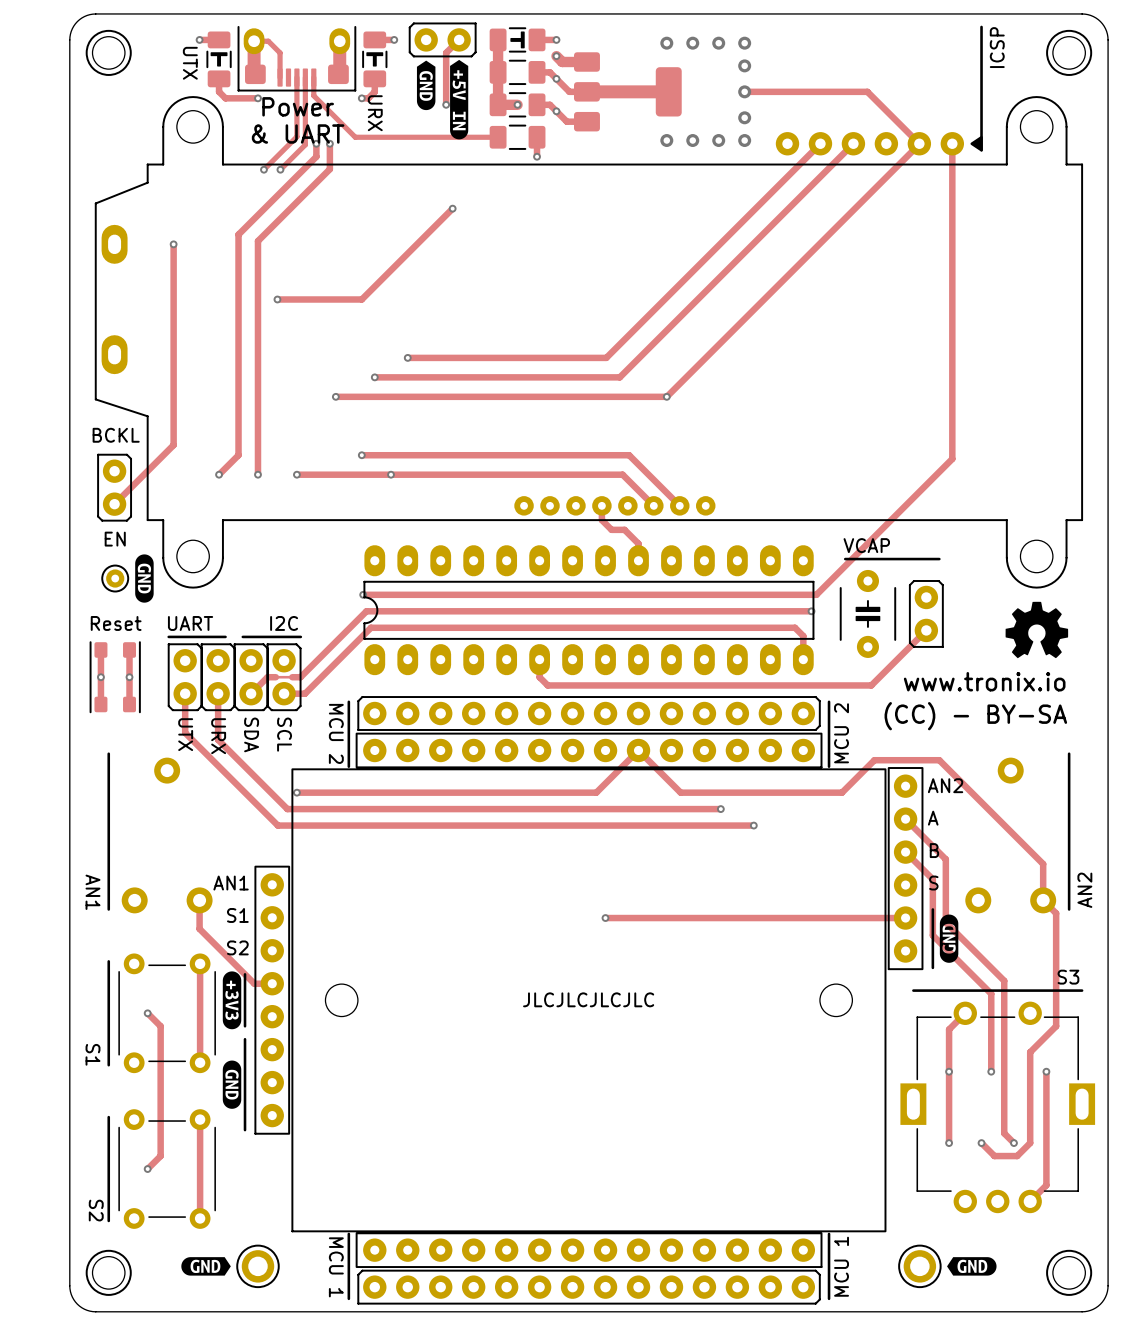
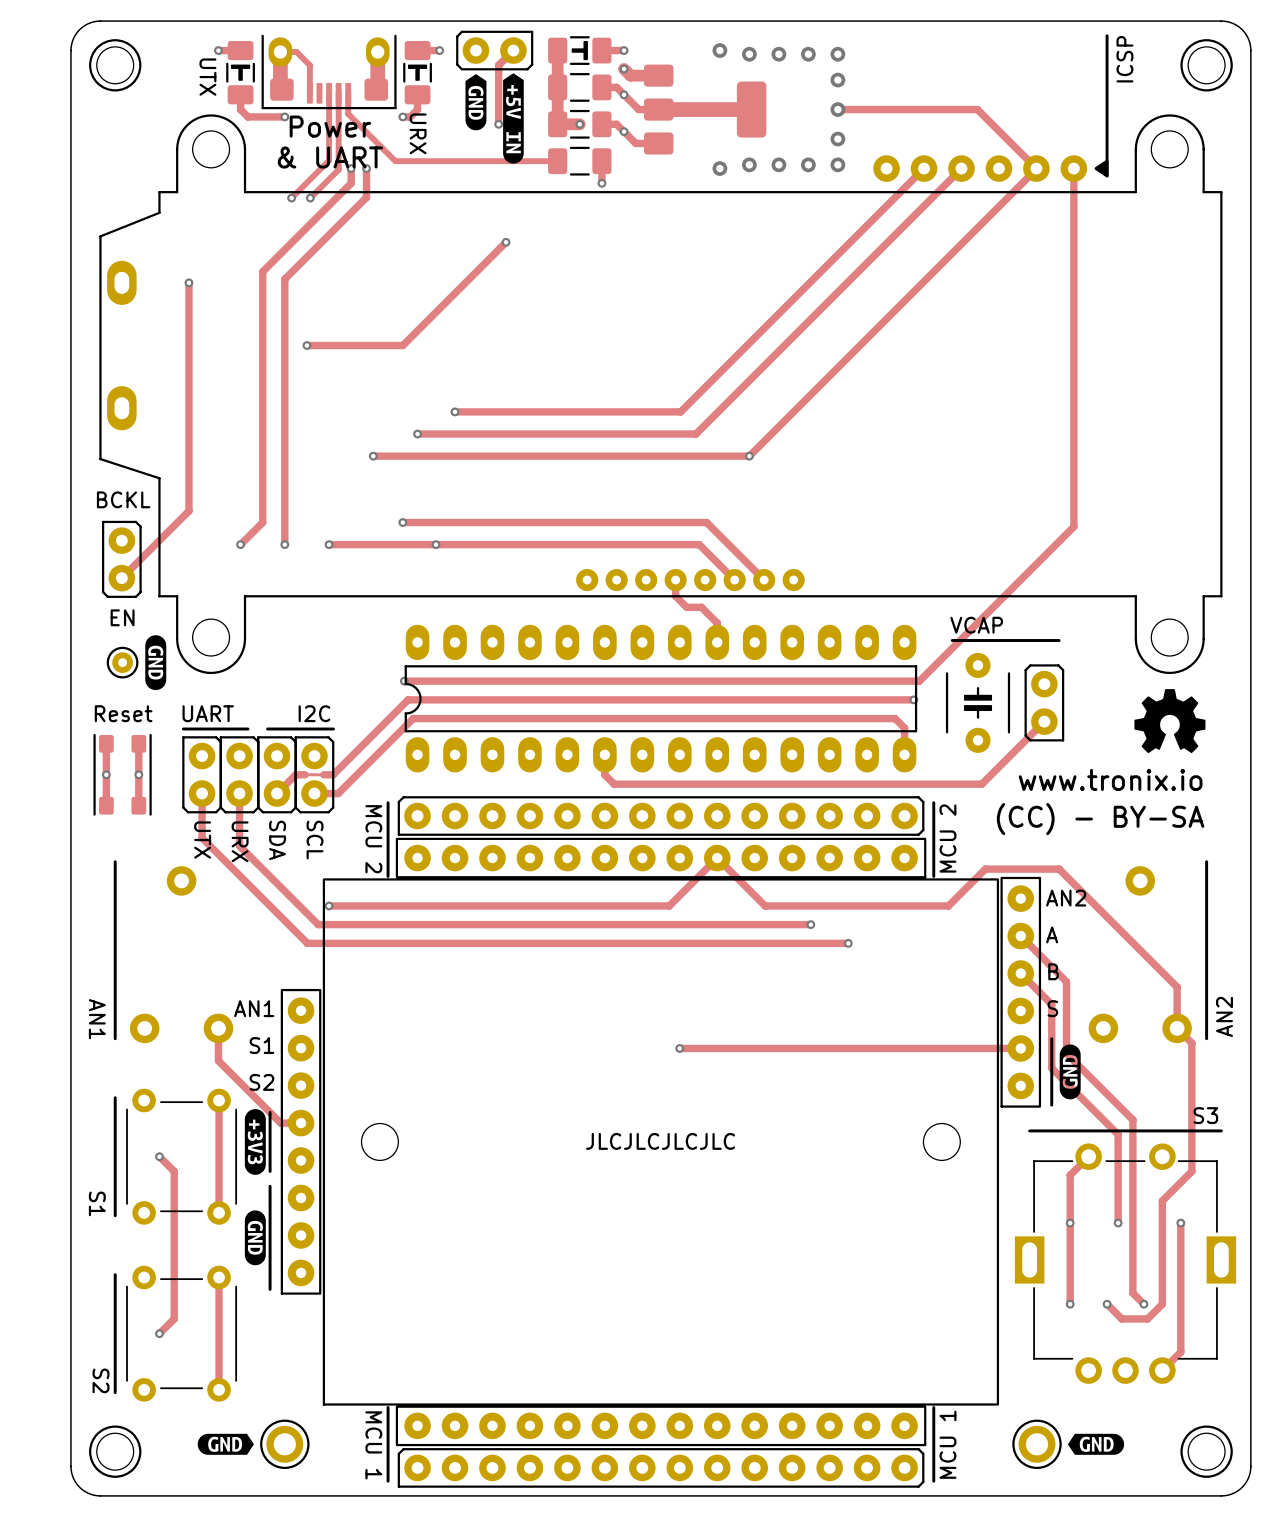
via: none -> (719, 50)
via: none -> (719, 168)

